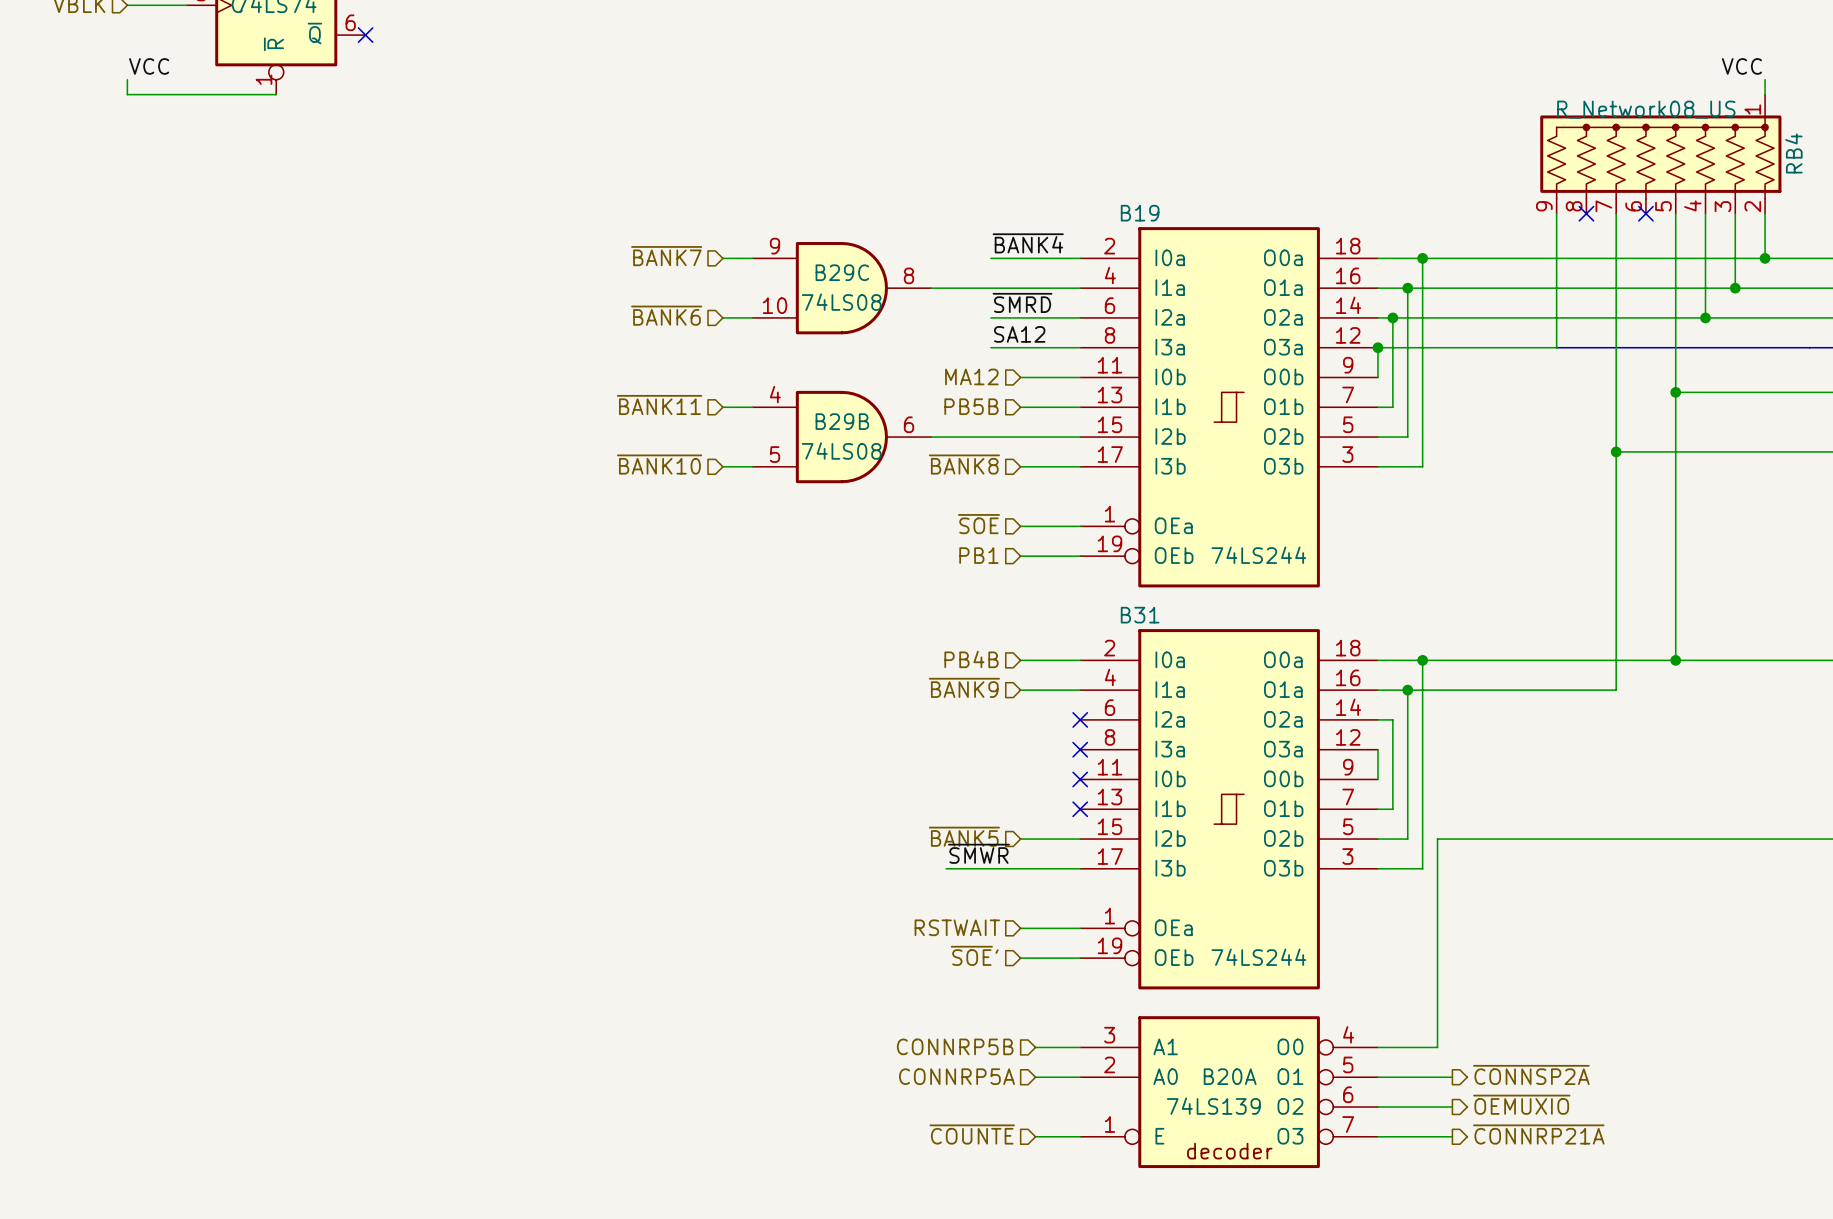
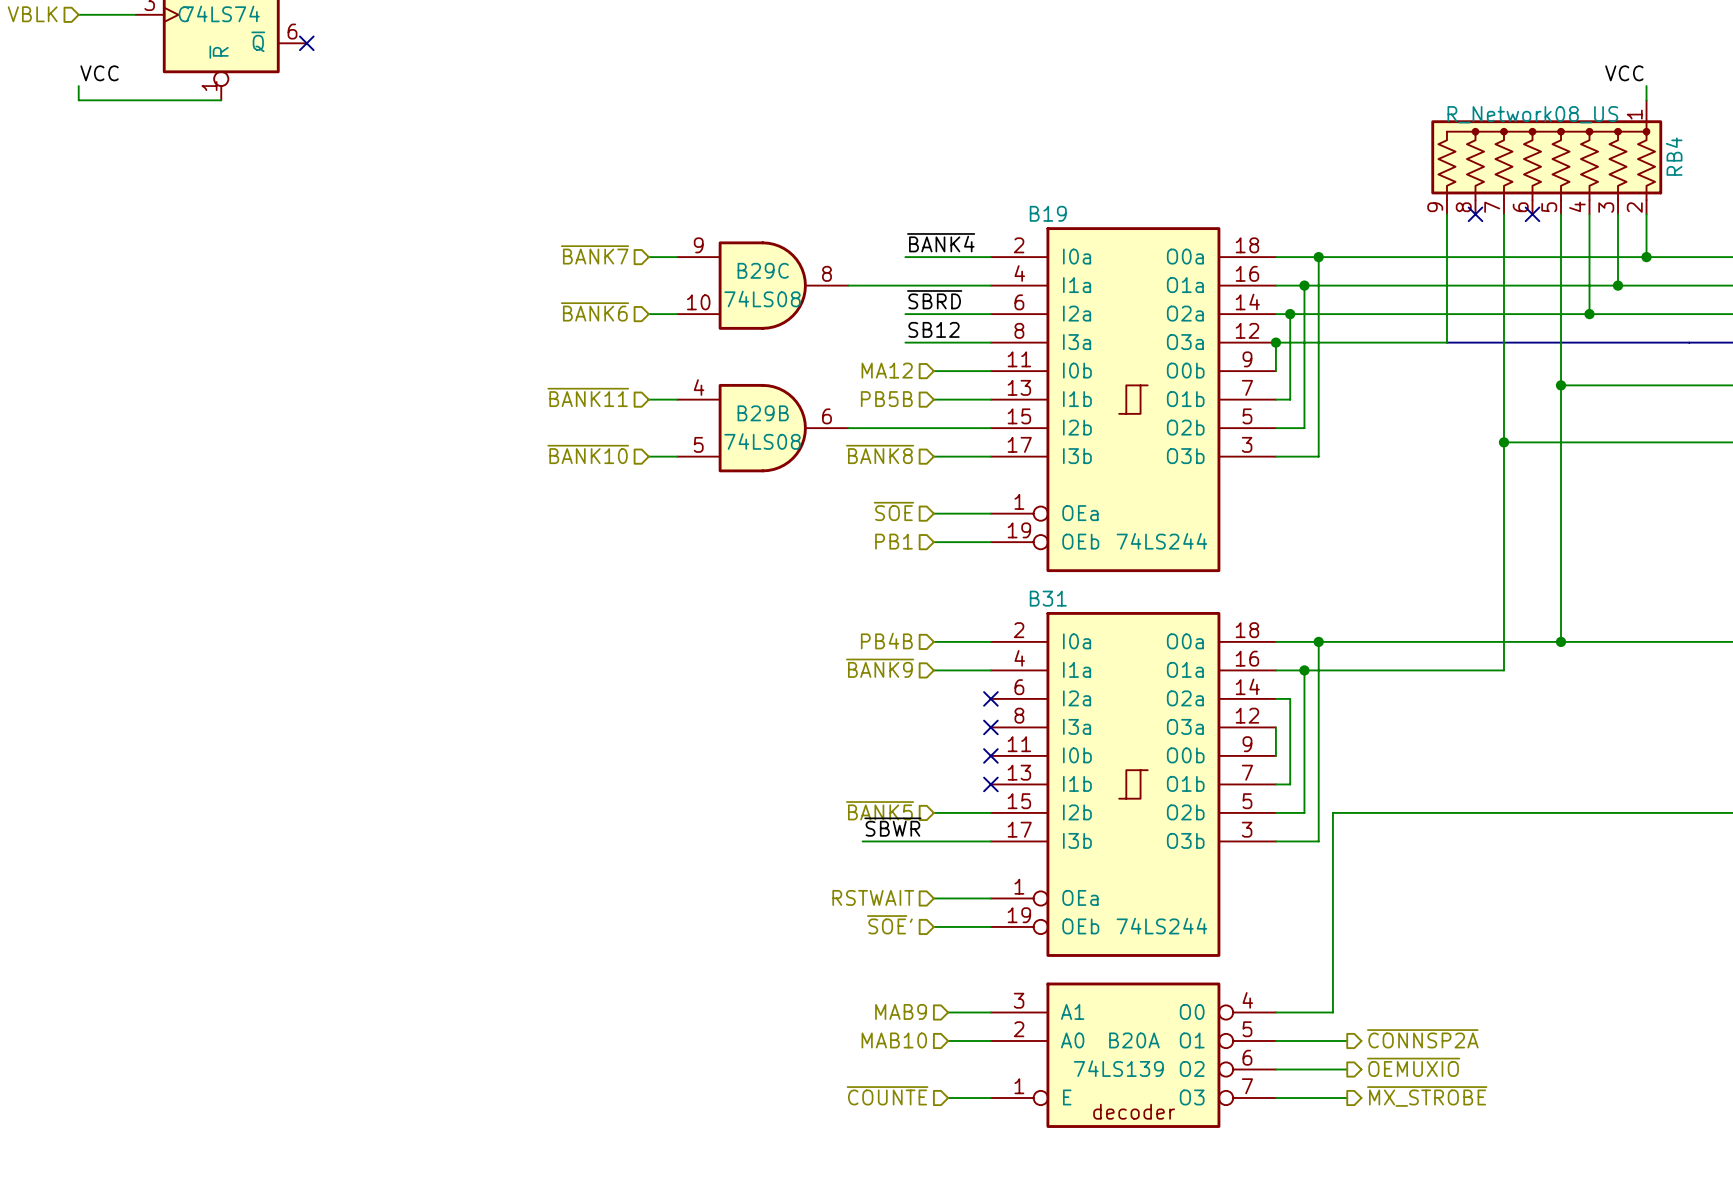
label: ~{SMRD} (1022, 302) -> ~{SBRD} (934, 299)
label: SA12 (1019, 334) -> SB12 (934, 329)
label: ~{SMWR} (978, 853) -> ~{SBWR} (892, 827)
hierarchical label: CONNRP5B (955, 1046) -> MAB9 (901, 1011)
hierarchical label: CONNRP5A (956, 1076) -> MAB10 (894, 1040)
hierarchical label: ~{CONNRP21A} (1538, 1134) -> ~{MX_STROBE} (1427, 1096)

